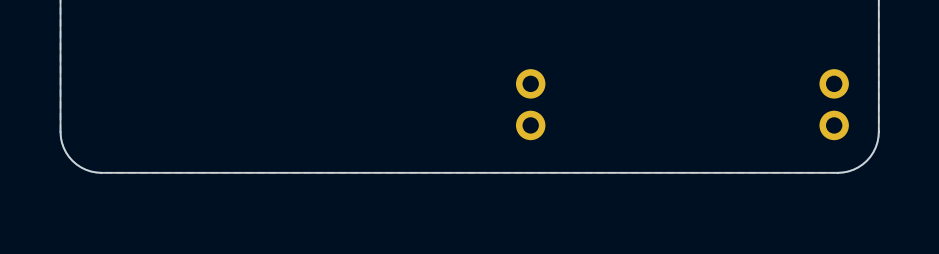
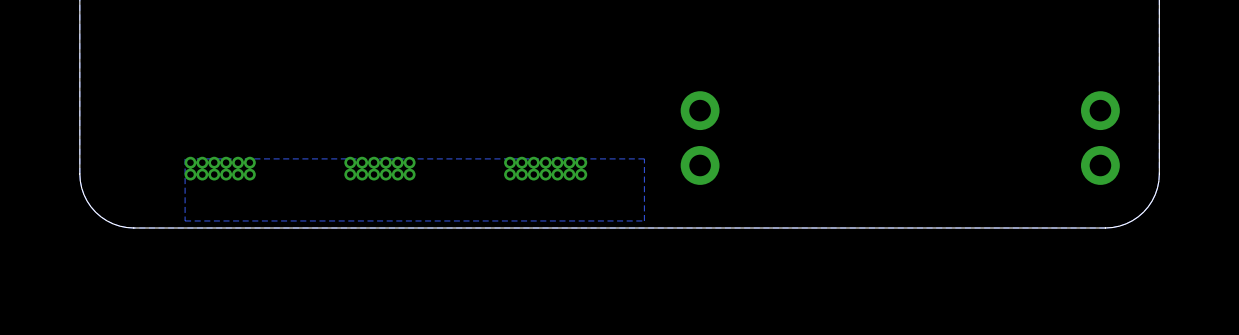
zone outline: none -> (644, 158) (644, 220) (185, 220) (185, 158) (644, 158)
via: none -> (190, 162)
via: none -> (202, 162)
via: none -> (214, 162)
via: none -> (226, 162)
via: none -> (237, 162)
via: none -> (249, 162)
via: none -> (350, 162)
via: none -> (362, 162)
via: none -> (374, 162)
via: none -> (385, 162)
via: none -> (397, 162)
via: none -> (409, 162)
via: none -> (510, 162)
via: none -> (521, 162)
via: none -> (533, 162)
via: none -> (545, 162)
via: none -> (557, 162)
via: none -> (569, 162)
via: none -> (581, 162)
via: none -> (190, 174)
via: none -> (202, 174)
via: none -> (214, 174)
via: none -> (226, 174)
via: none -> (237, 174)
via: none -> (249, 174)
via: none -> (350, 174)
via: none -> (362, 174)
via: none -> (374, 174)
via: none -> (385, 174)
via: none -> (397, 174)
via: none -> (409, 174)
via: none -> (510, 174)
via: none -> (521, 174)
via: none -> (533, 174)
via: none -> (545, 174)
via: none -> (557, 174)
via: none -> (569, 174)
via: none -> (581, 174)

